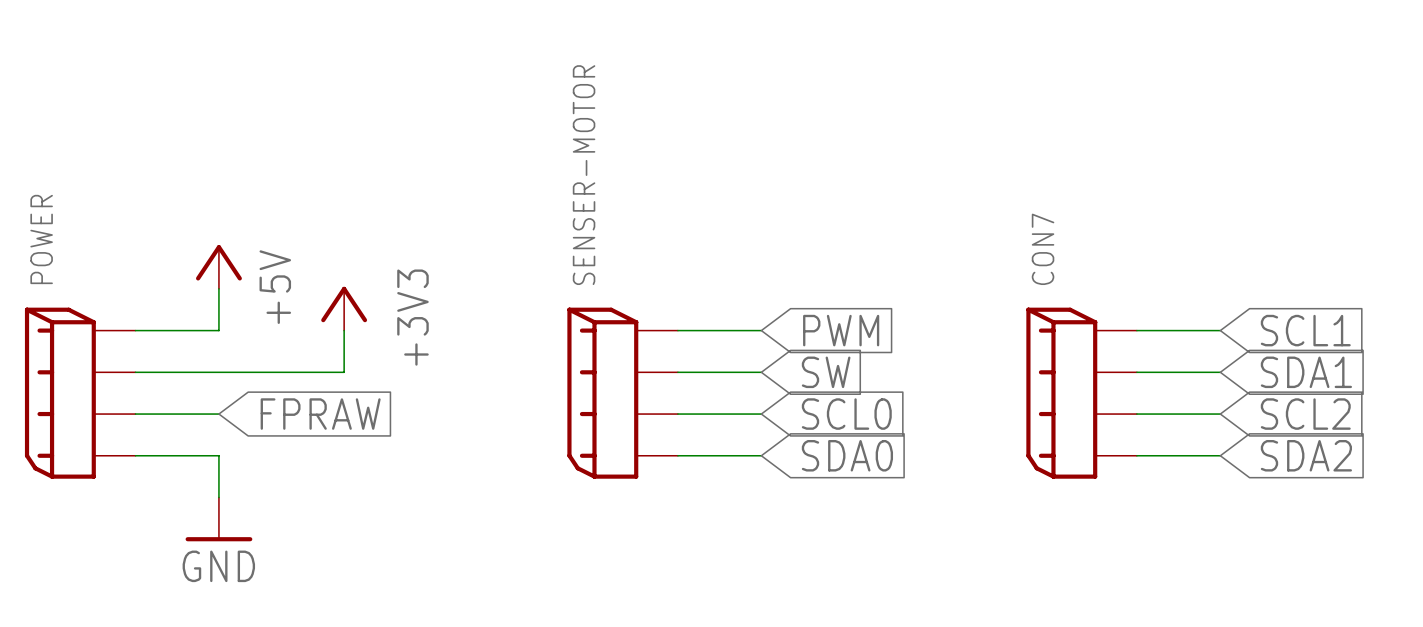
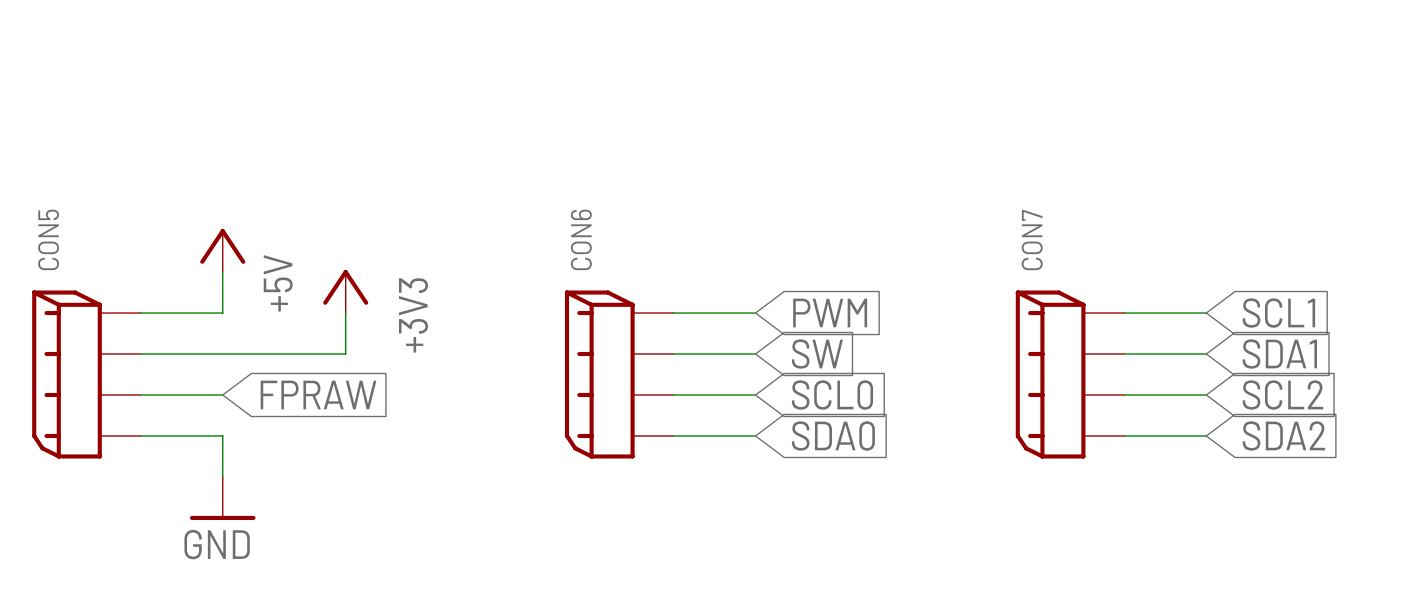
SENSER-MOTOR name: SENSER-MOTOR (584, 175) -> CON6 (581, 239)
POWER name: POWER (41, 239) -> CON5 (48, 239)

